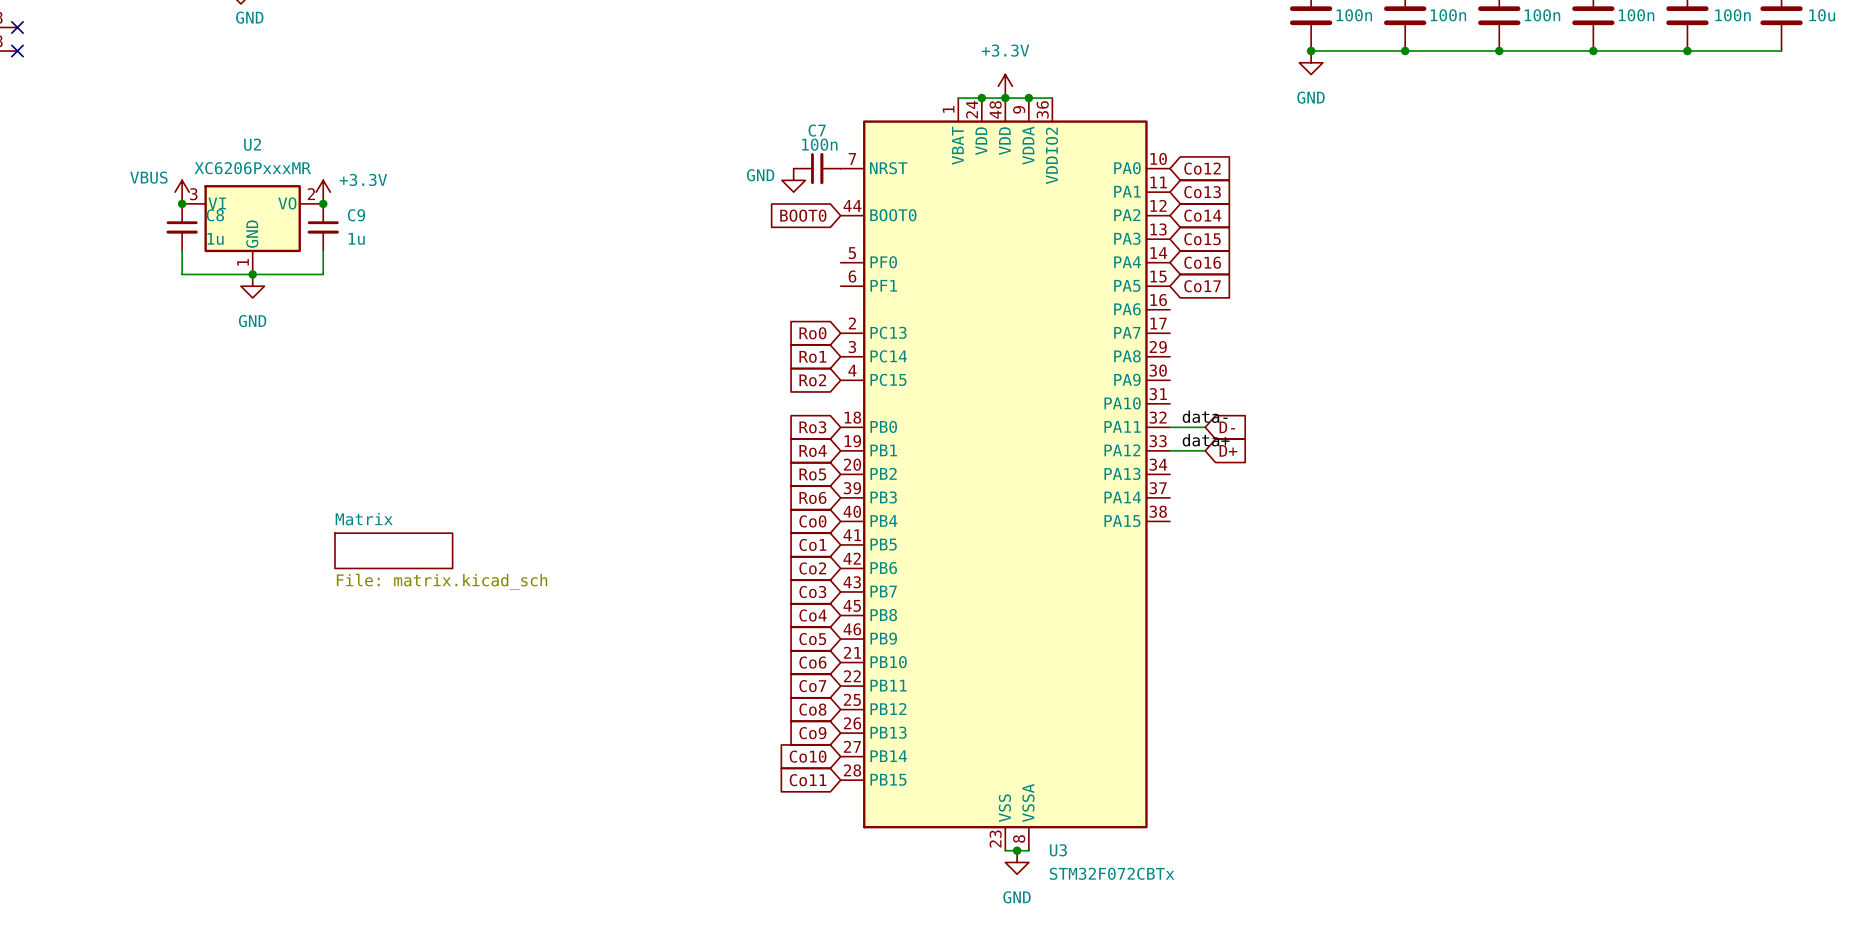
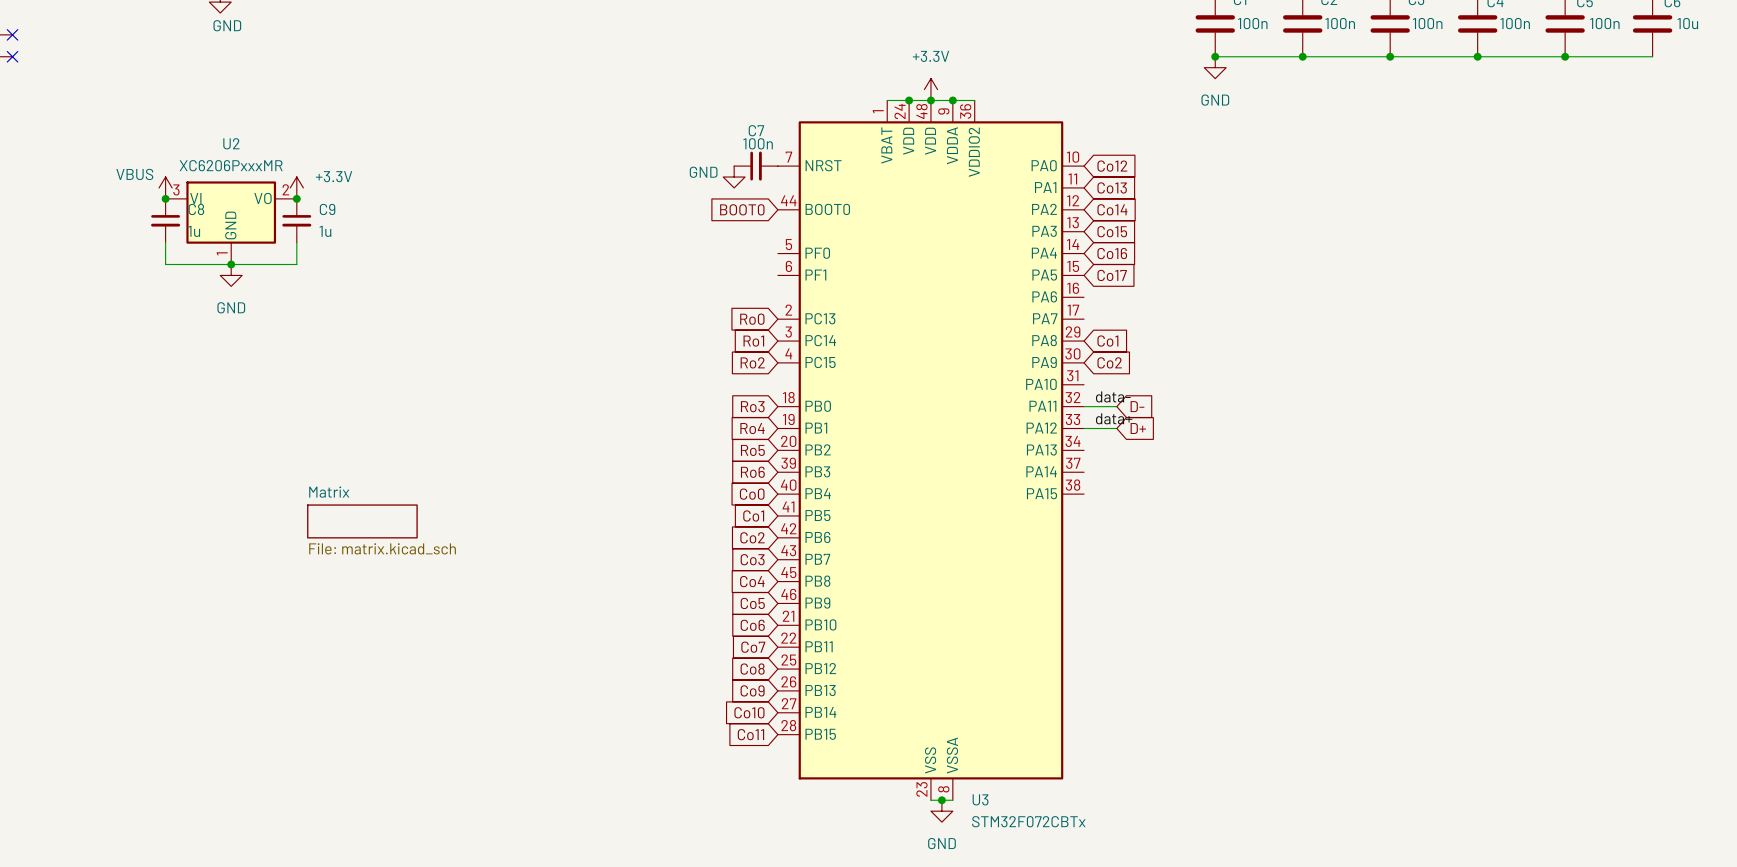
global label: none -> Co1 (1107, 341)
global label: none -> Co2 (1109, 362)

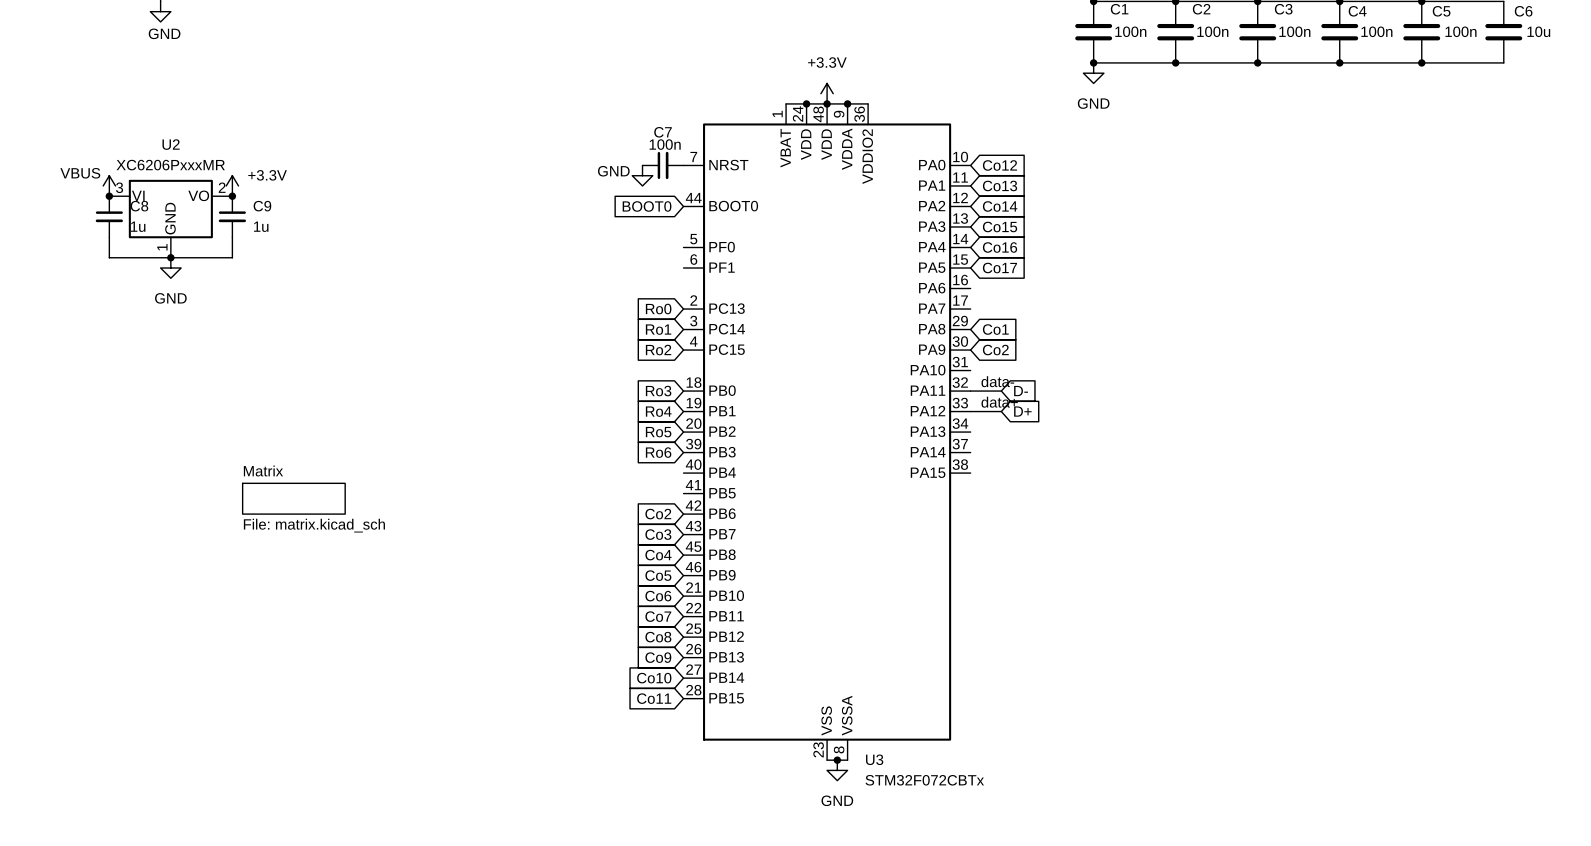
global label: Co0 (752, 494) -> none
global label: Co1 (753, 515) -> none

